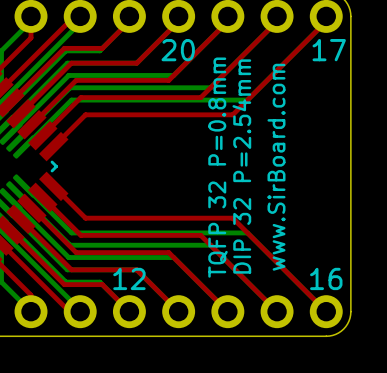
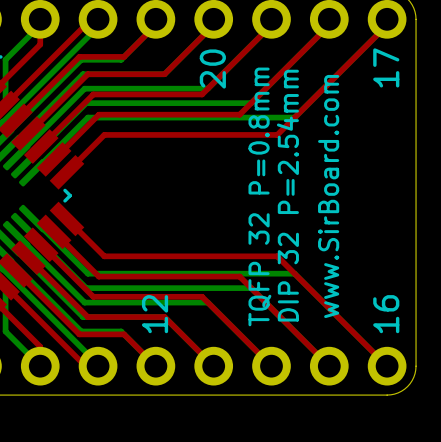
text rotation: 0° (178, 50) -> 90° counterclockwise (212, 68)
text rotation: 0° (329, 50) -> 90° counterclockwise (386, 67)
text rotation: 0° (129, 278) -> 90° counterclockwise (155, 314)
text rotation: 0° (326, 278) -> 90° counterclockwise (386, 314)

